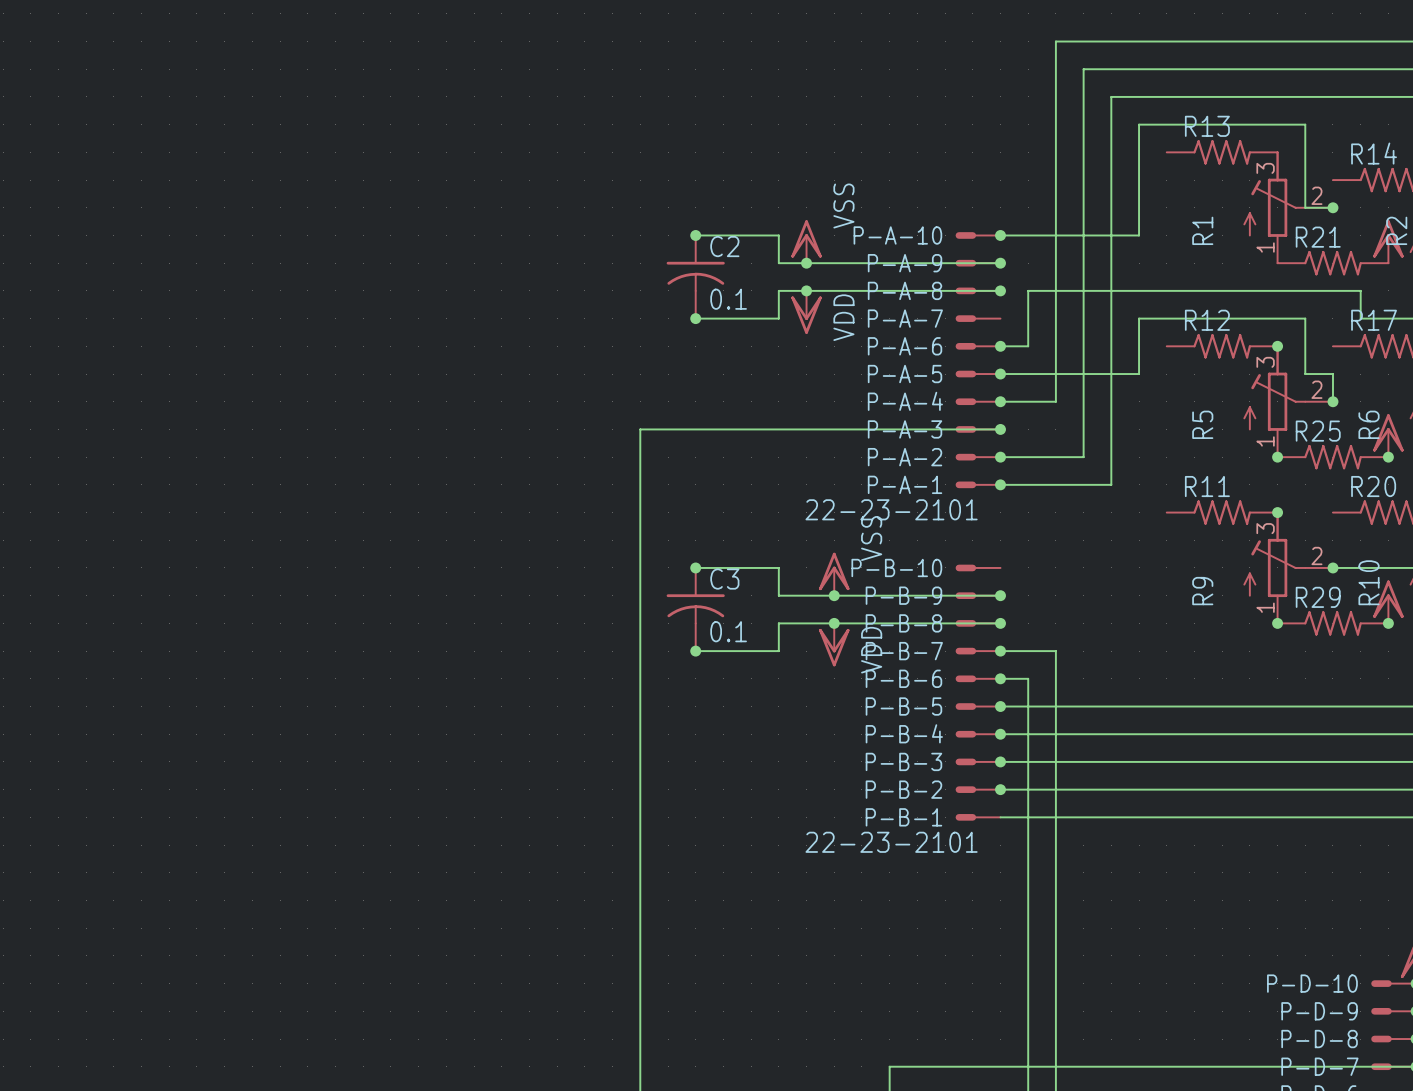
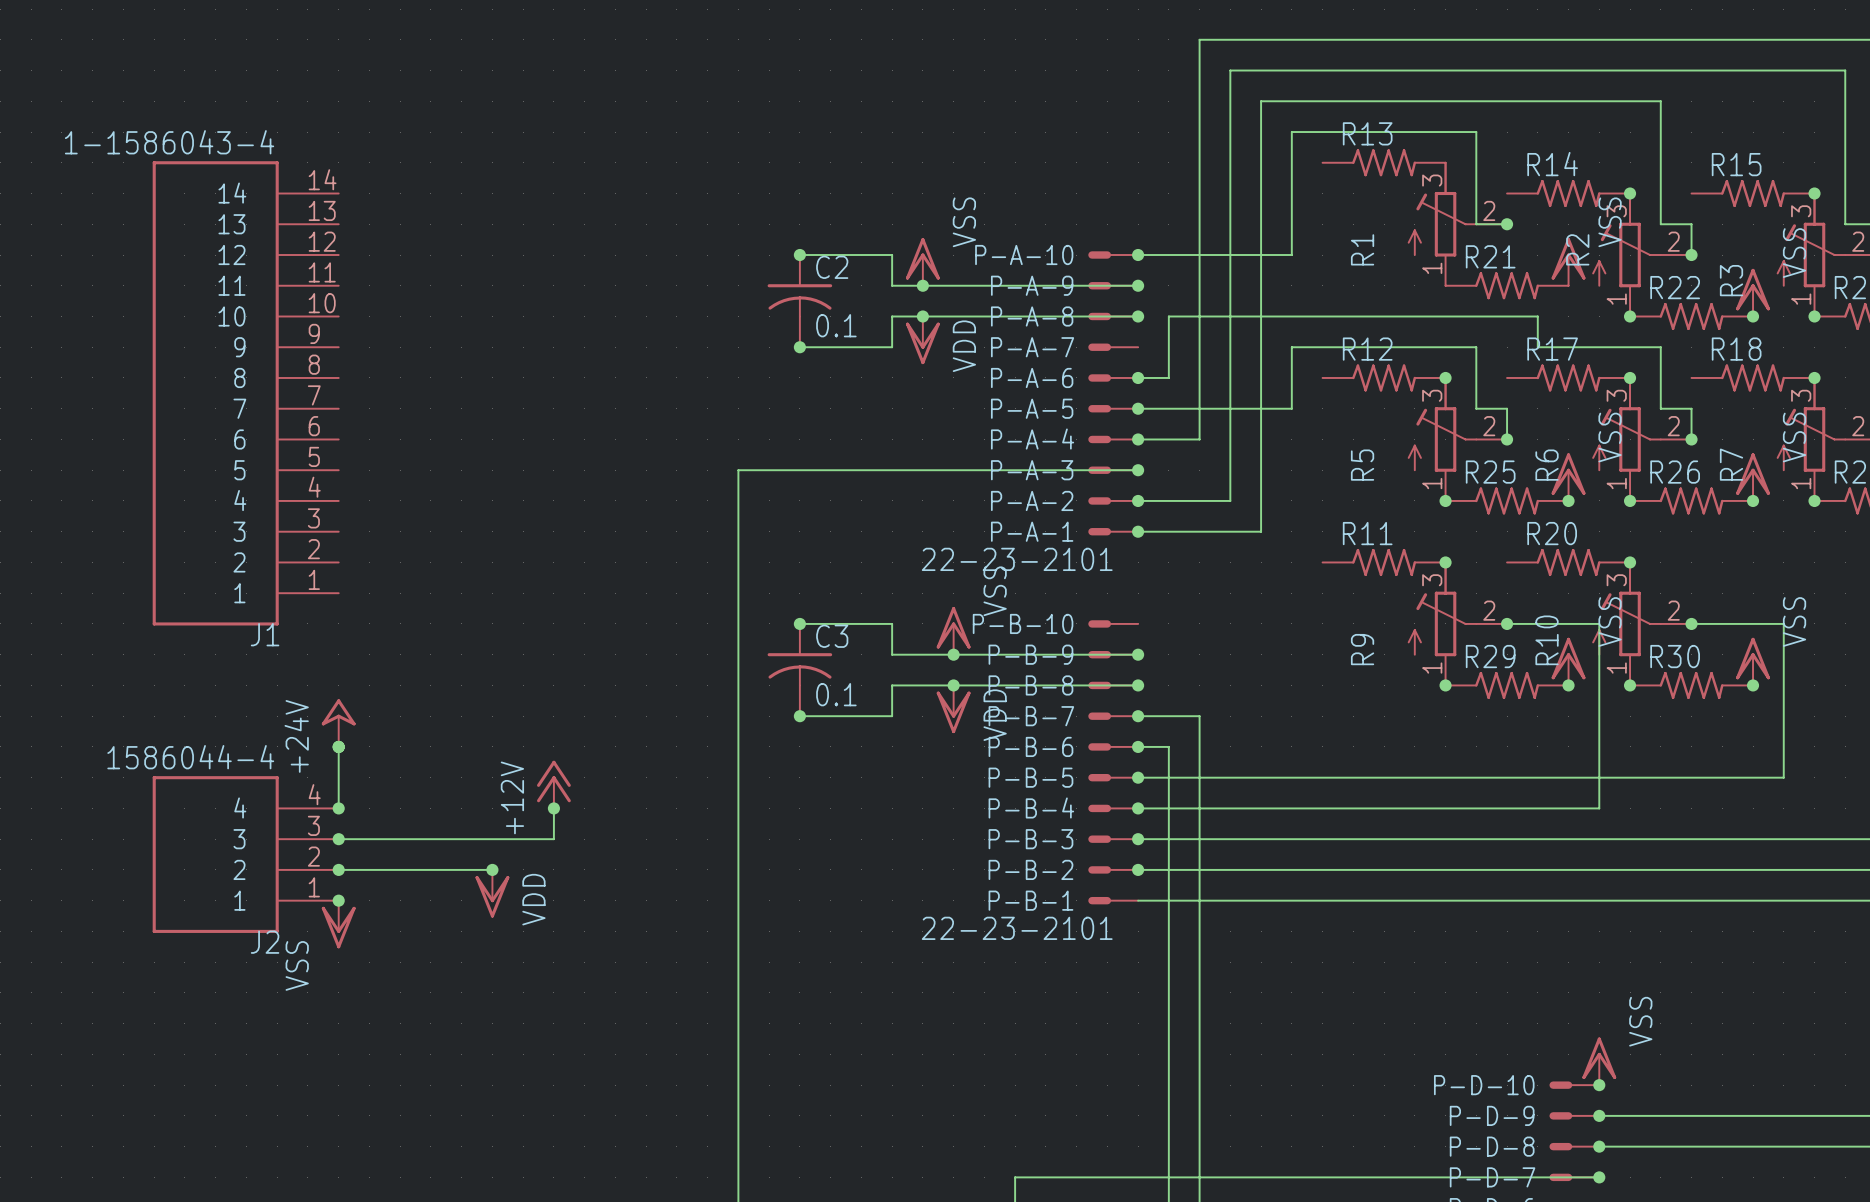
J1: none -> 1-1586043-4 (245, 393)
power symbol: none -> +24V (338, 723)
wire: none -> (338, 746) (338, 808)
junction: none -> (338, 746)
power symbol: none -> +12V (553, 784)
junction: none -> (338, 808)
wire: none -> (553, 808) (553, 839) (338, 839)
junction: none -> (553, 808)
junction: none -> (338, 839)
J2: none -> 1586044-4 (245, 854)
wire: none -> (338, 869) (492, 869)
junction: none -> (338, 869)
junction: none -> (492, 869)
power symbol: none -> VDD (492, 893)
junction: none -> (338, 900)
power symbol: none -> VSS (338, 924)

